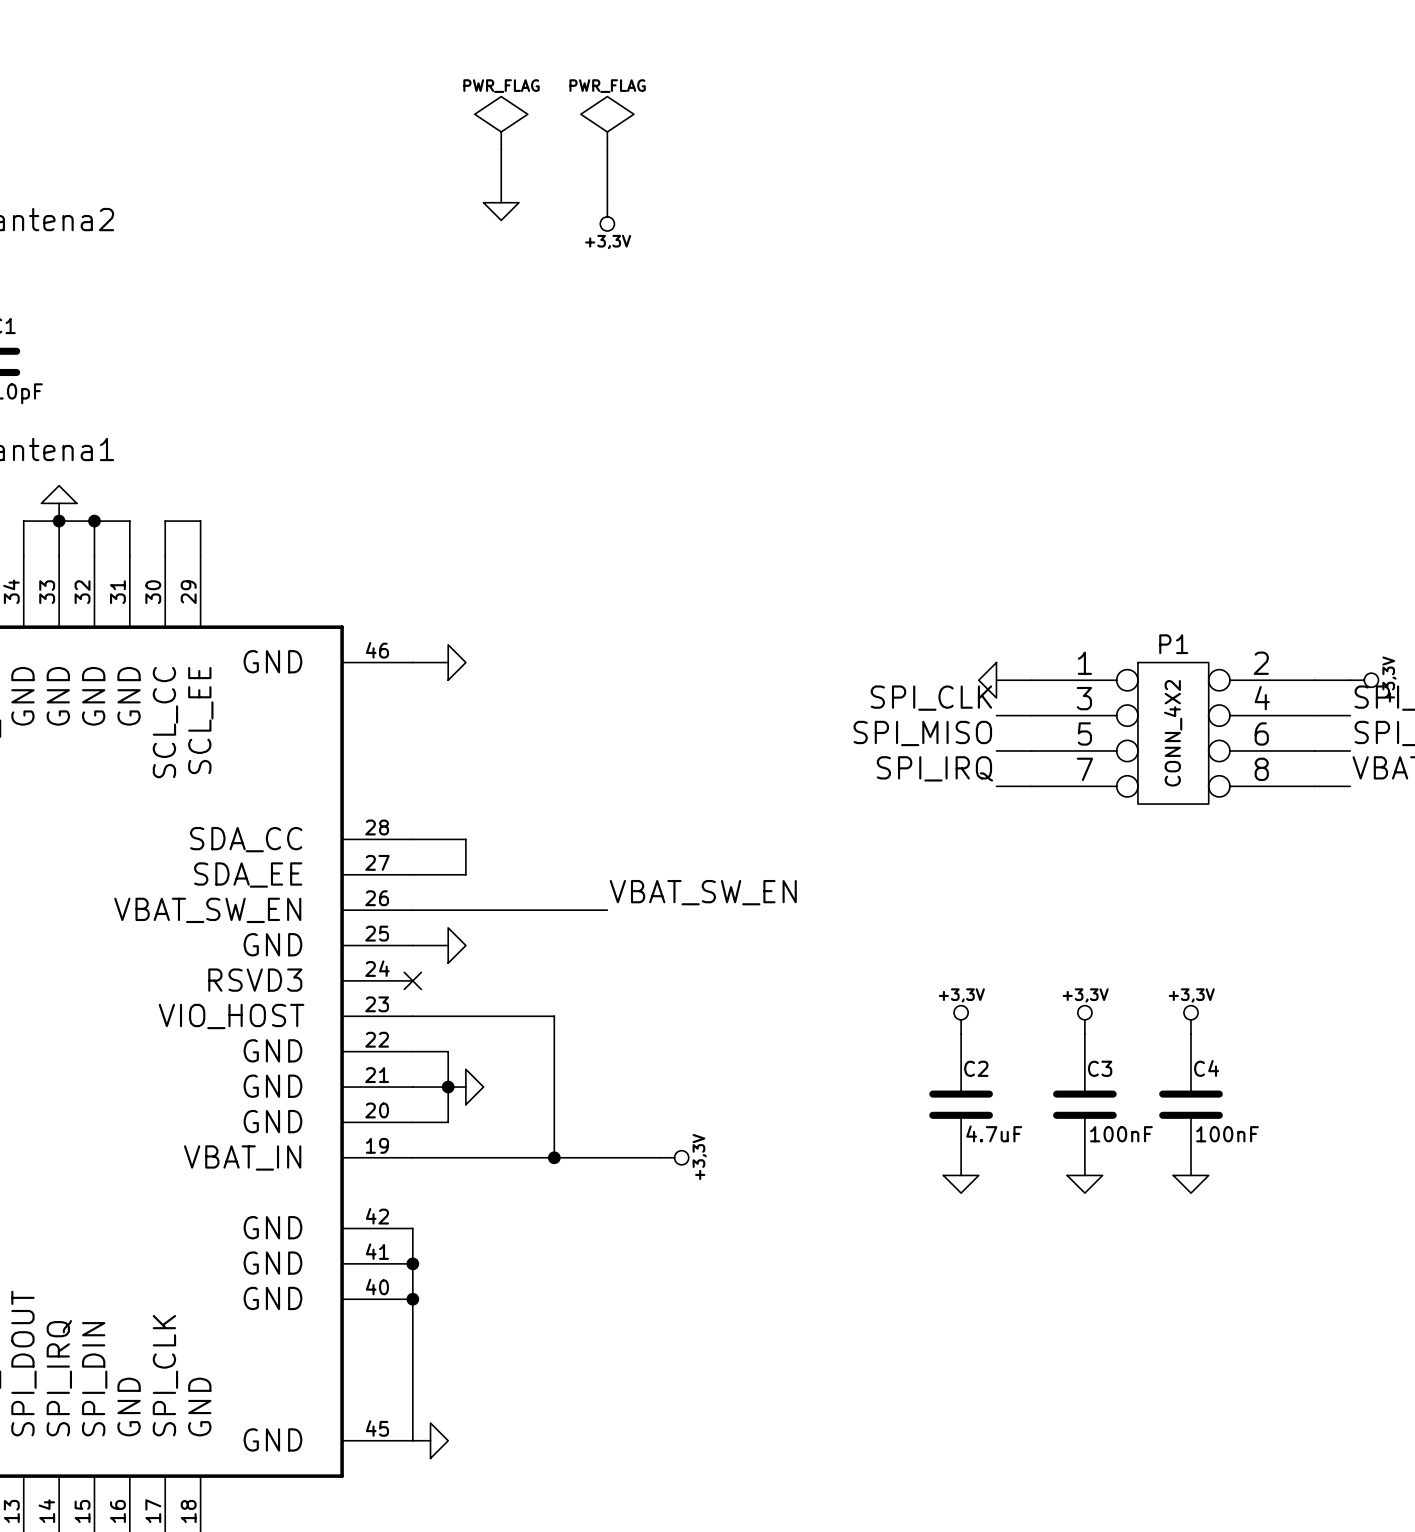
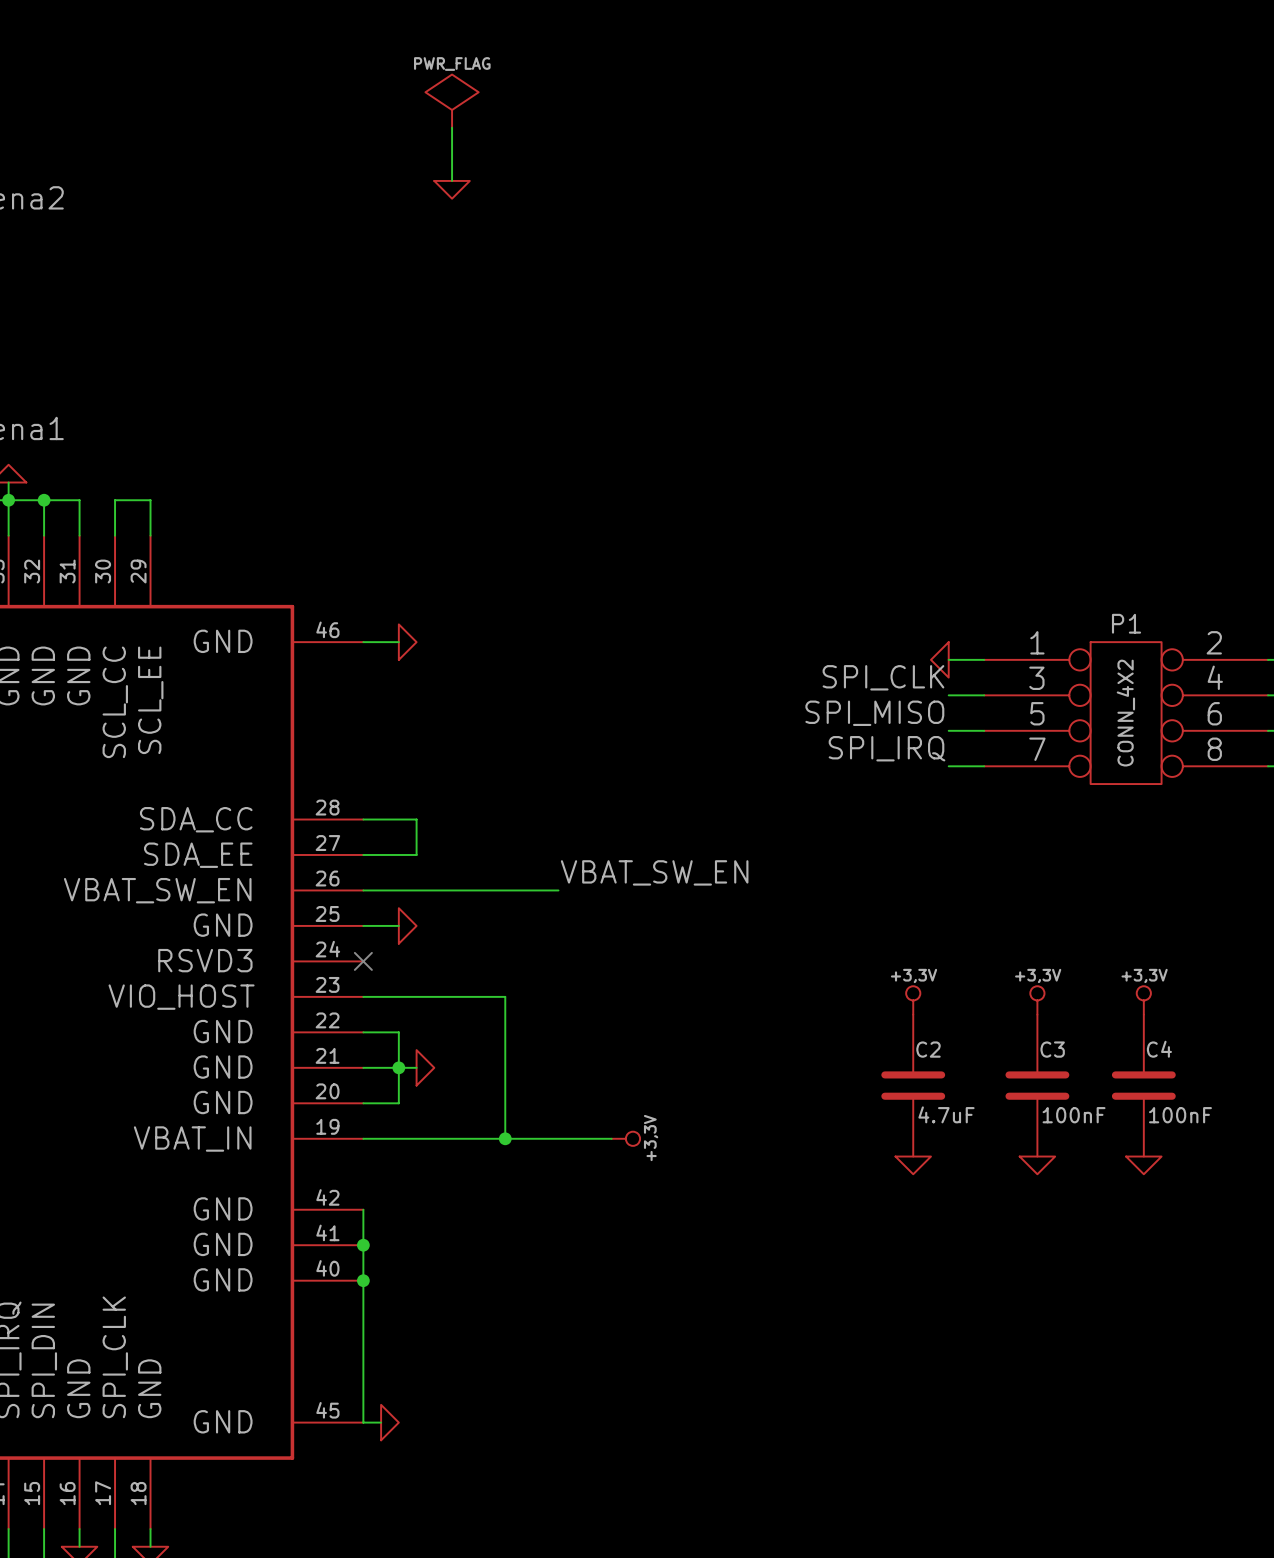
power symbol: PWR_FLAG (607, 123) -> none
wire: (607, 149) (607, 202) -> none
power symbol: +3,3V (607, 216) -> none

